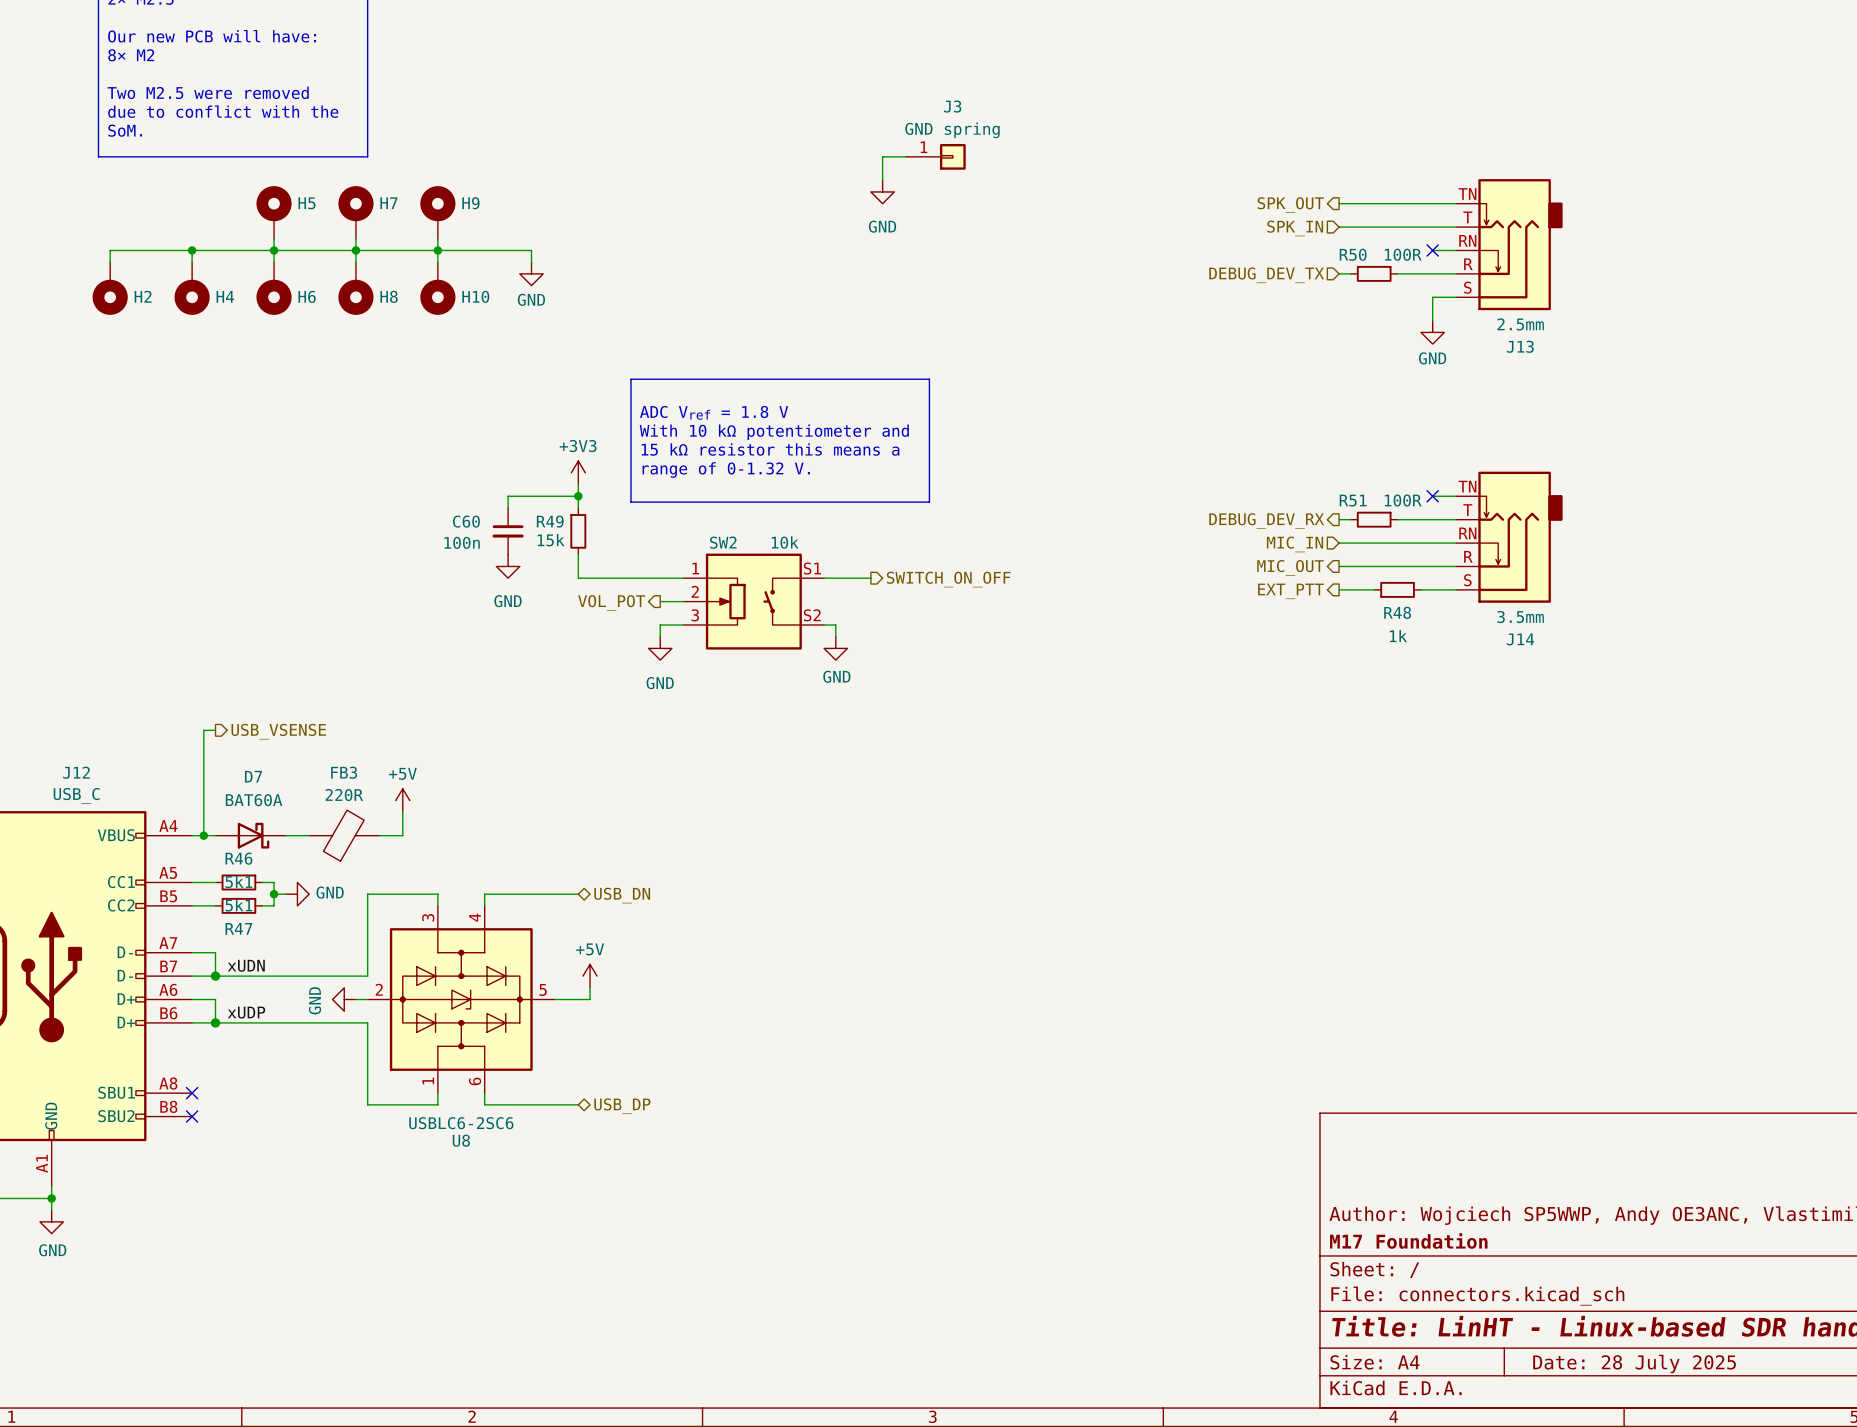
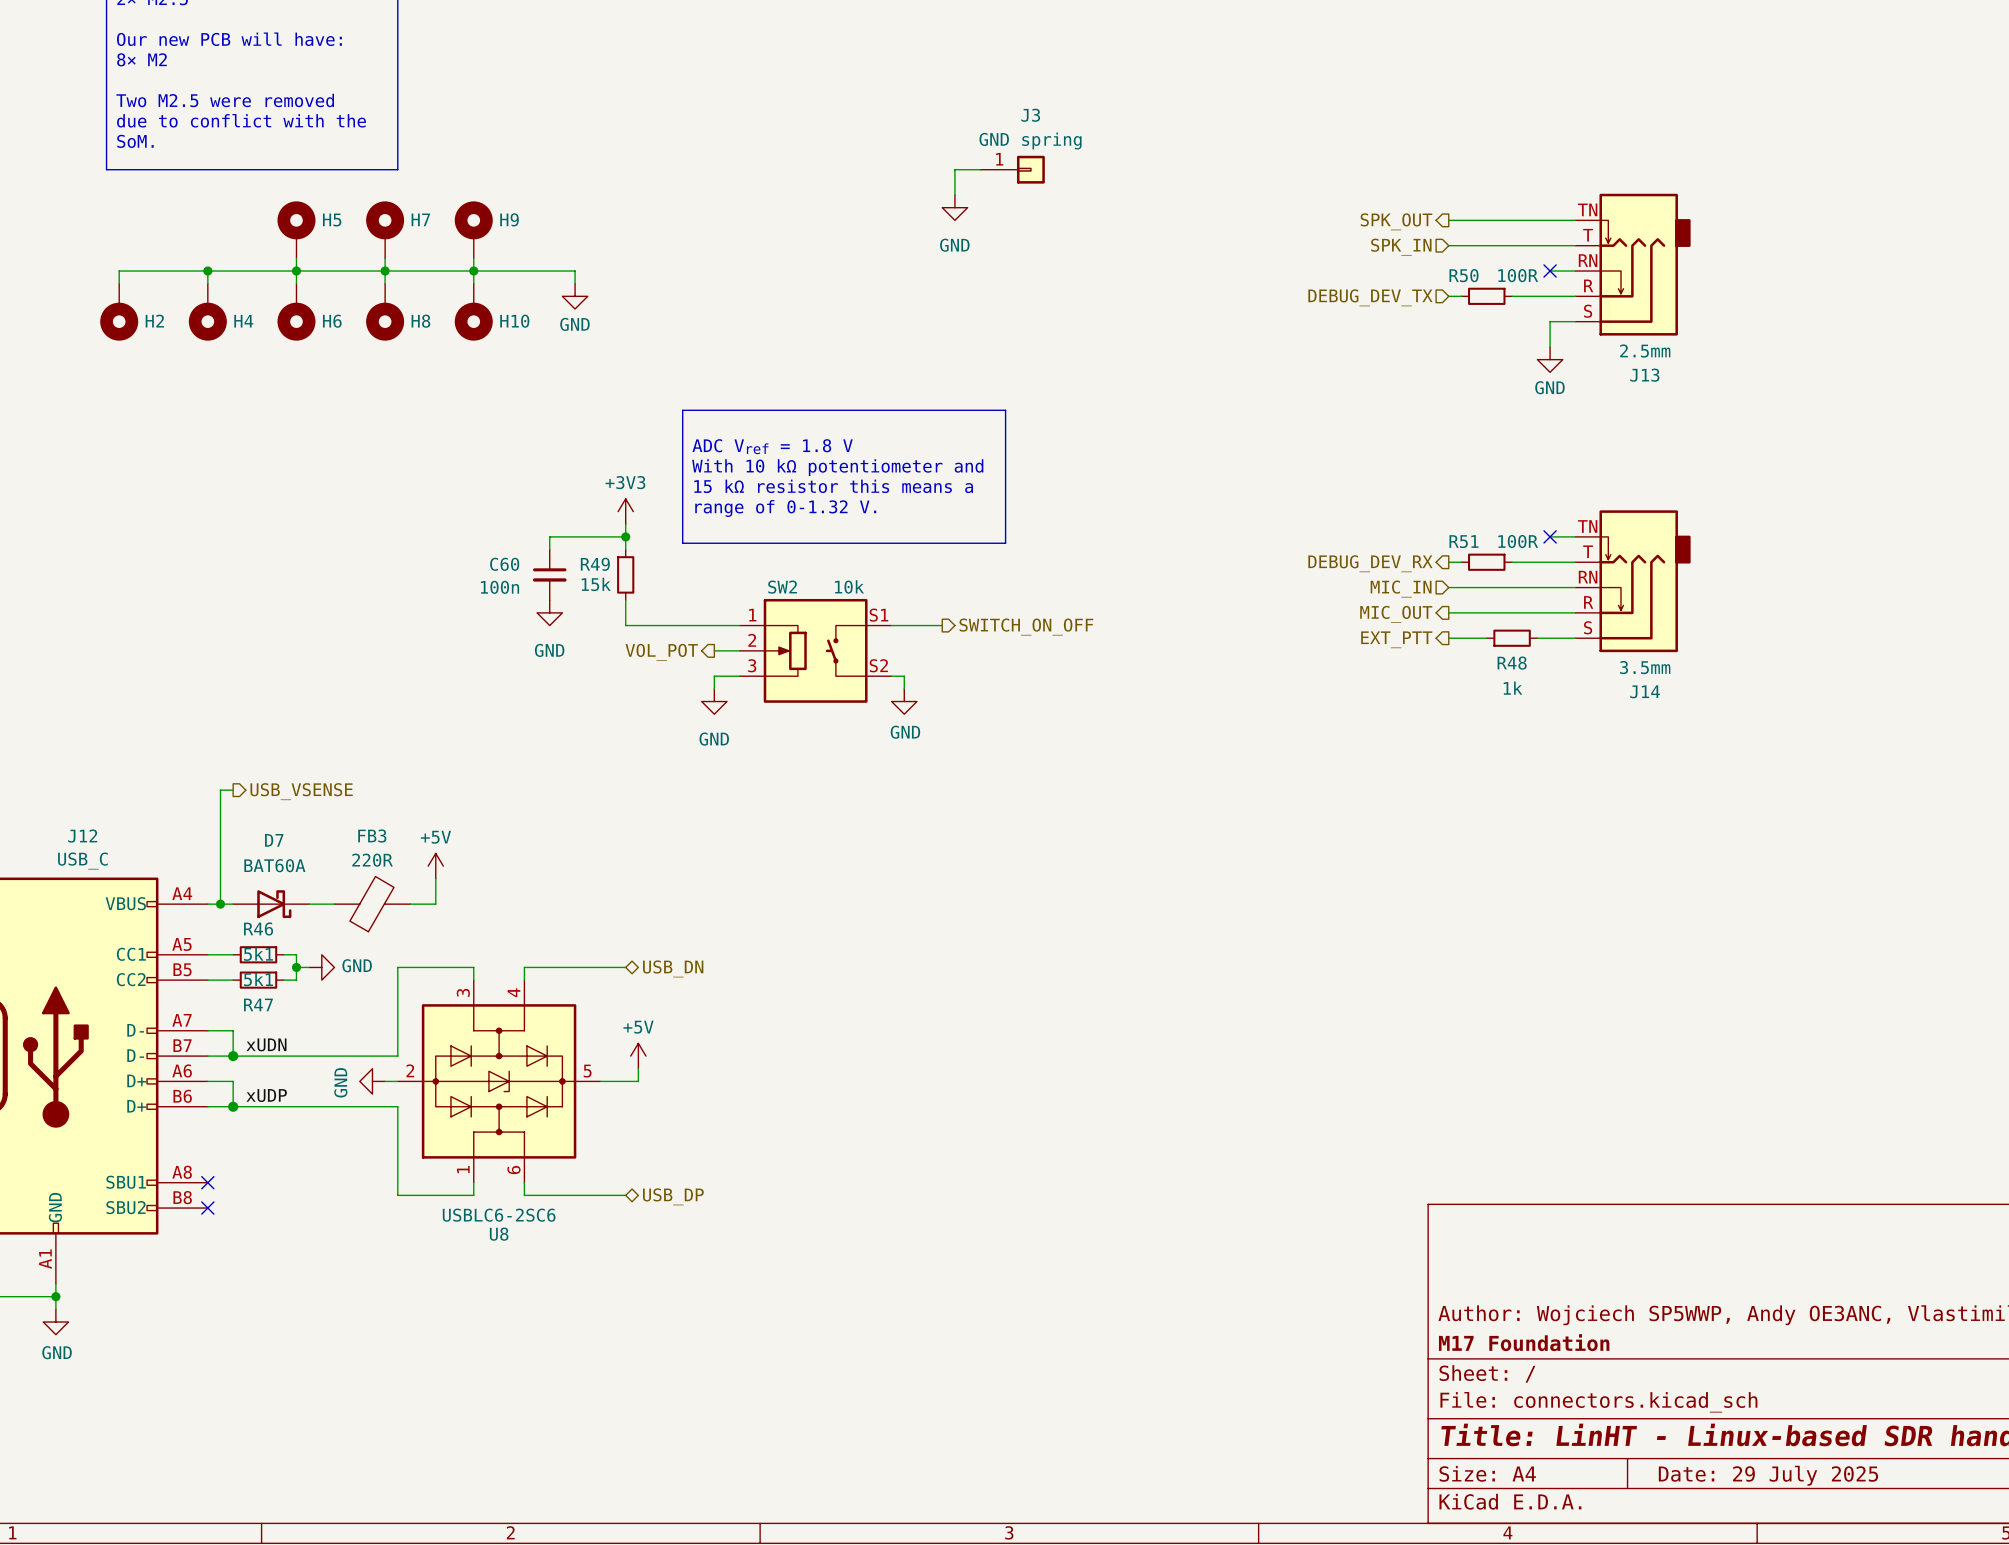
title block: Date: 28 July 2025 (1634, 1364) -> Date: 29 July 2025 (1768, 1475)

